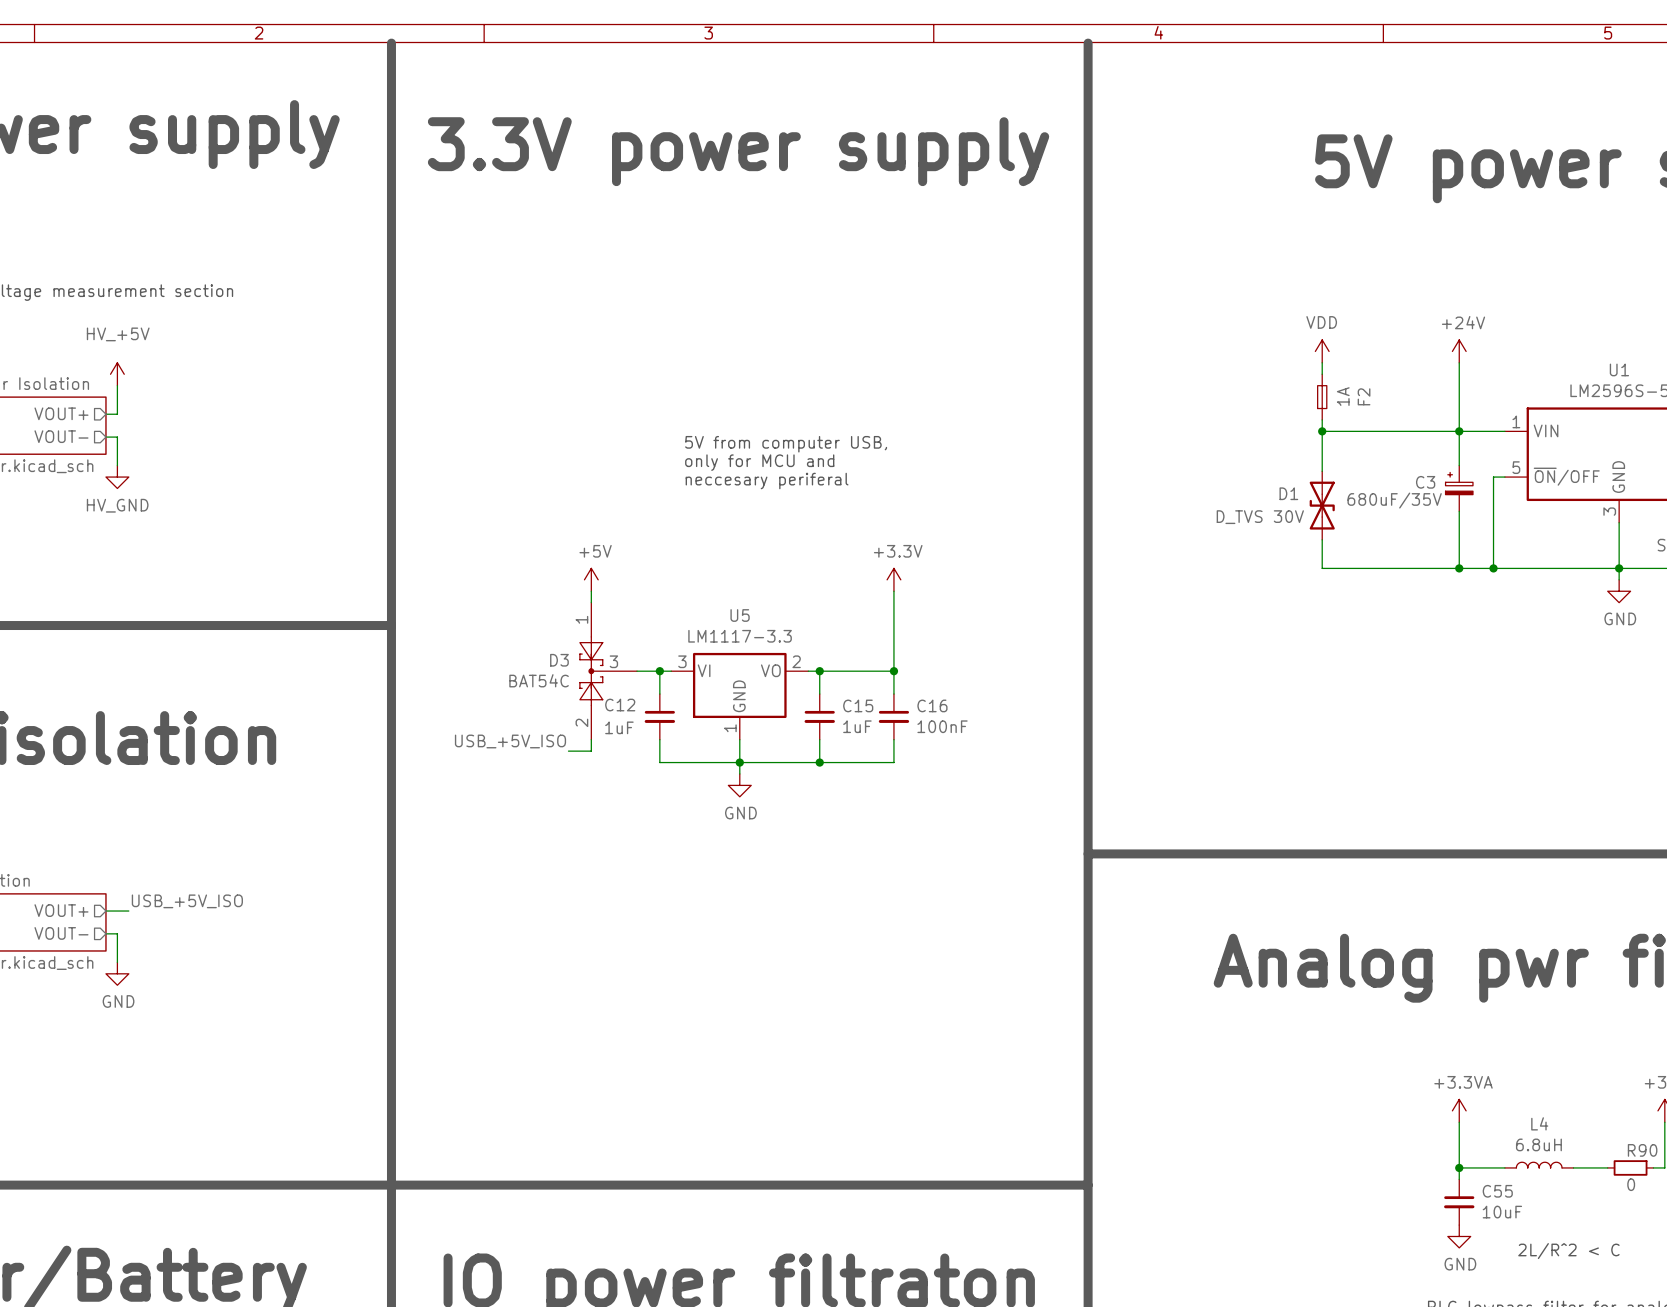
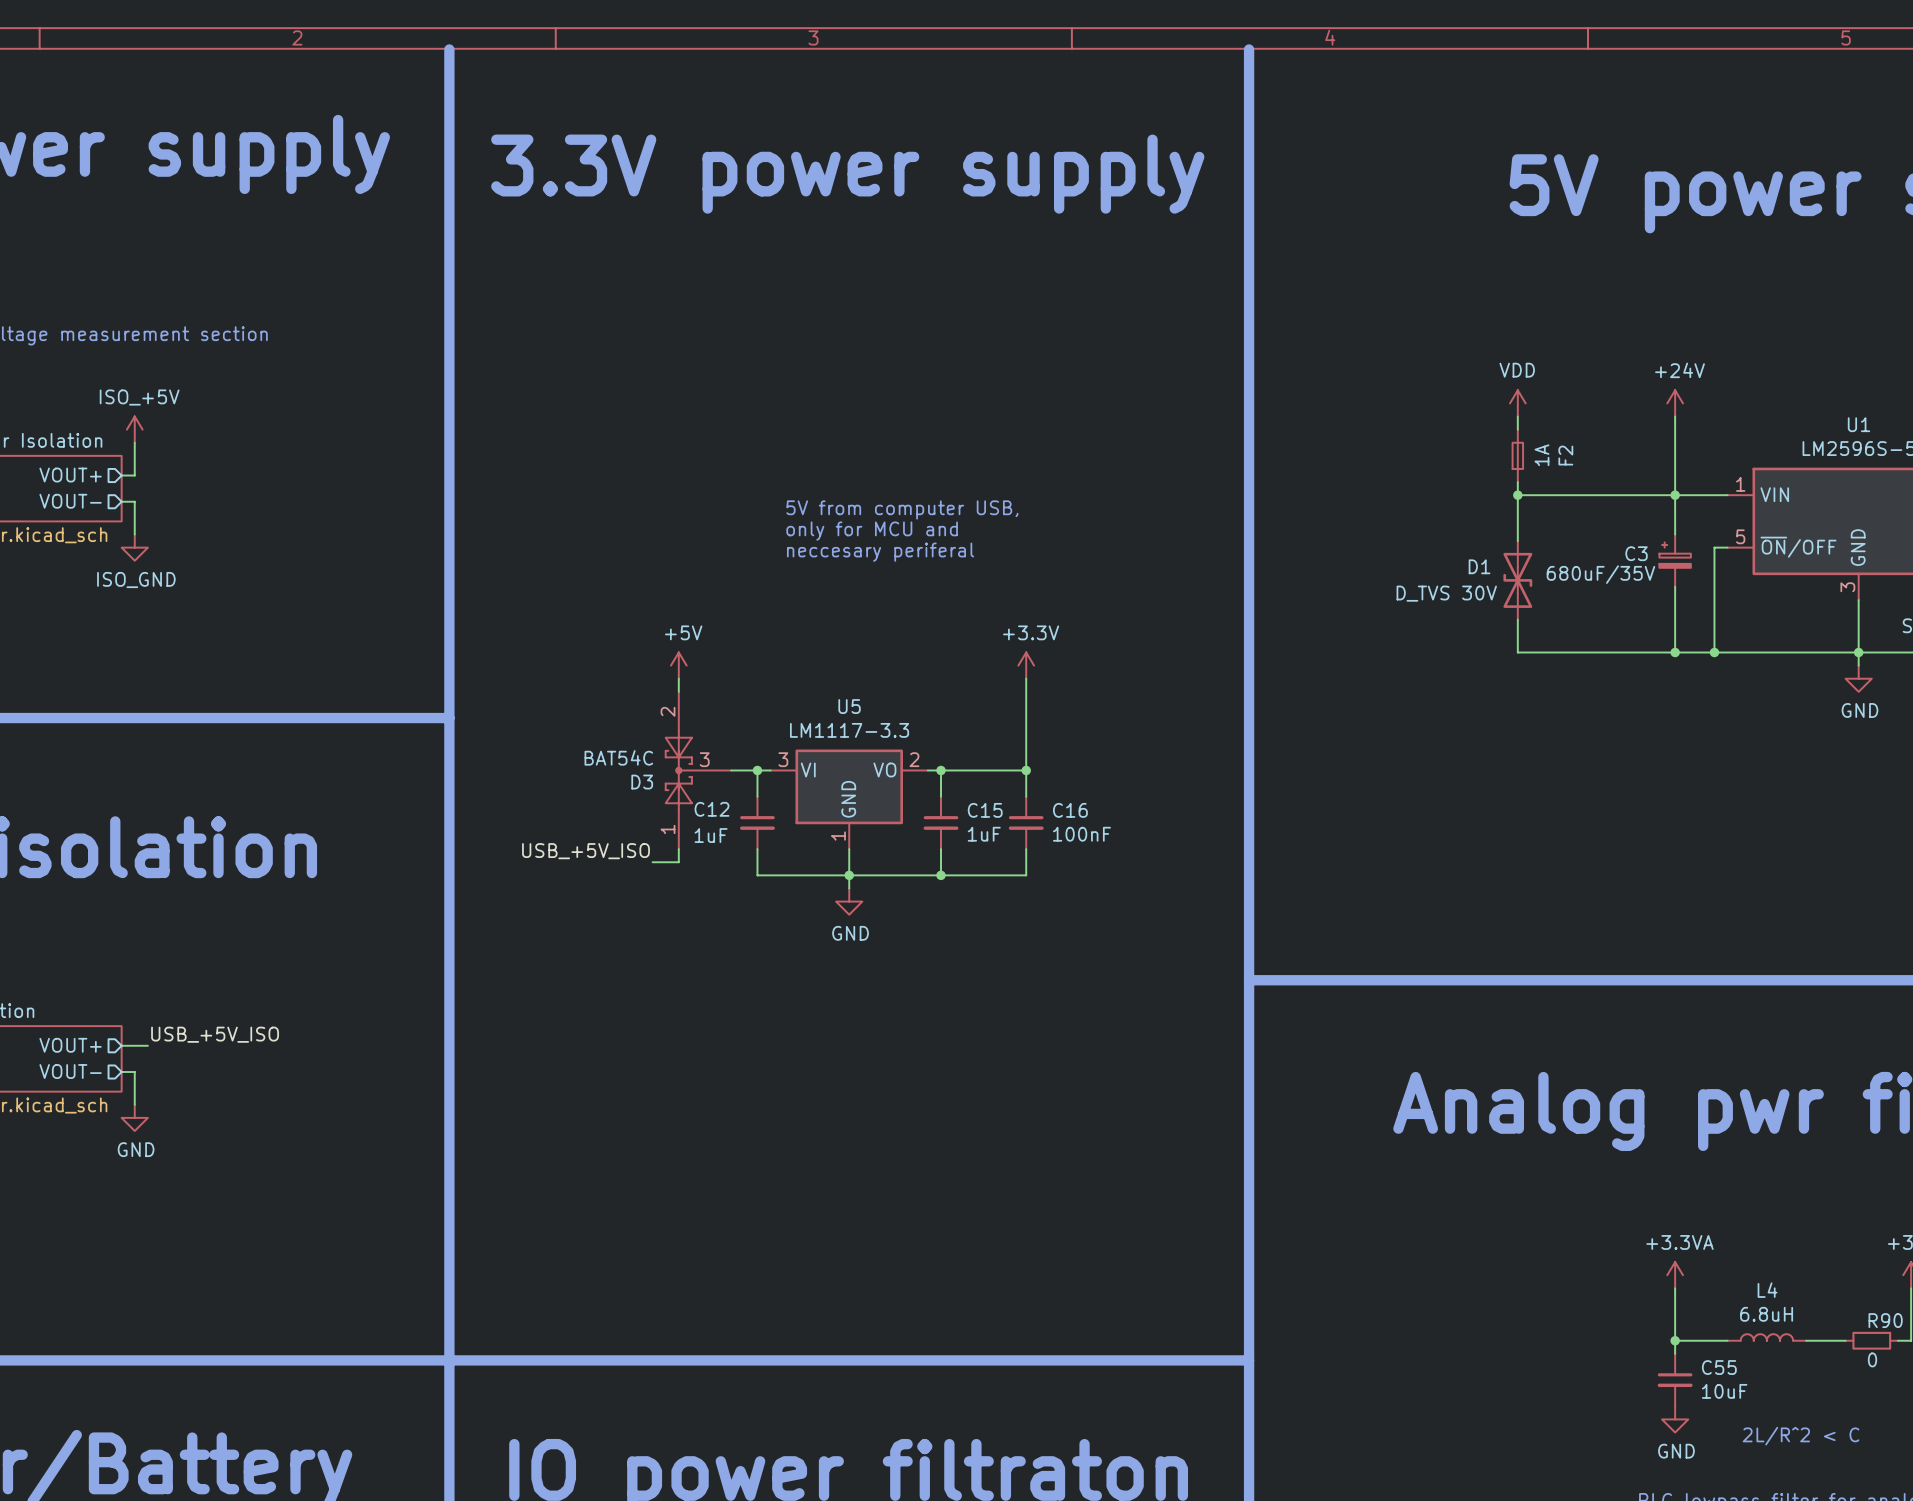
power symbol: HV_+5V (117, 374) -> ISO_+5V (134, 429)
power symbol: HV_GND (117, 477) -> ISO_GND (134, 547)
D3 flip: as is (591, 671) -> up-down (678, 770)

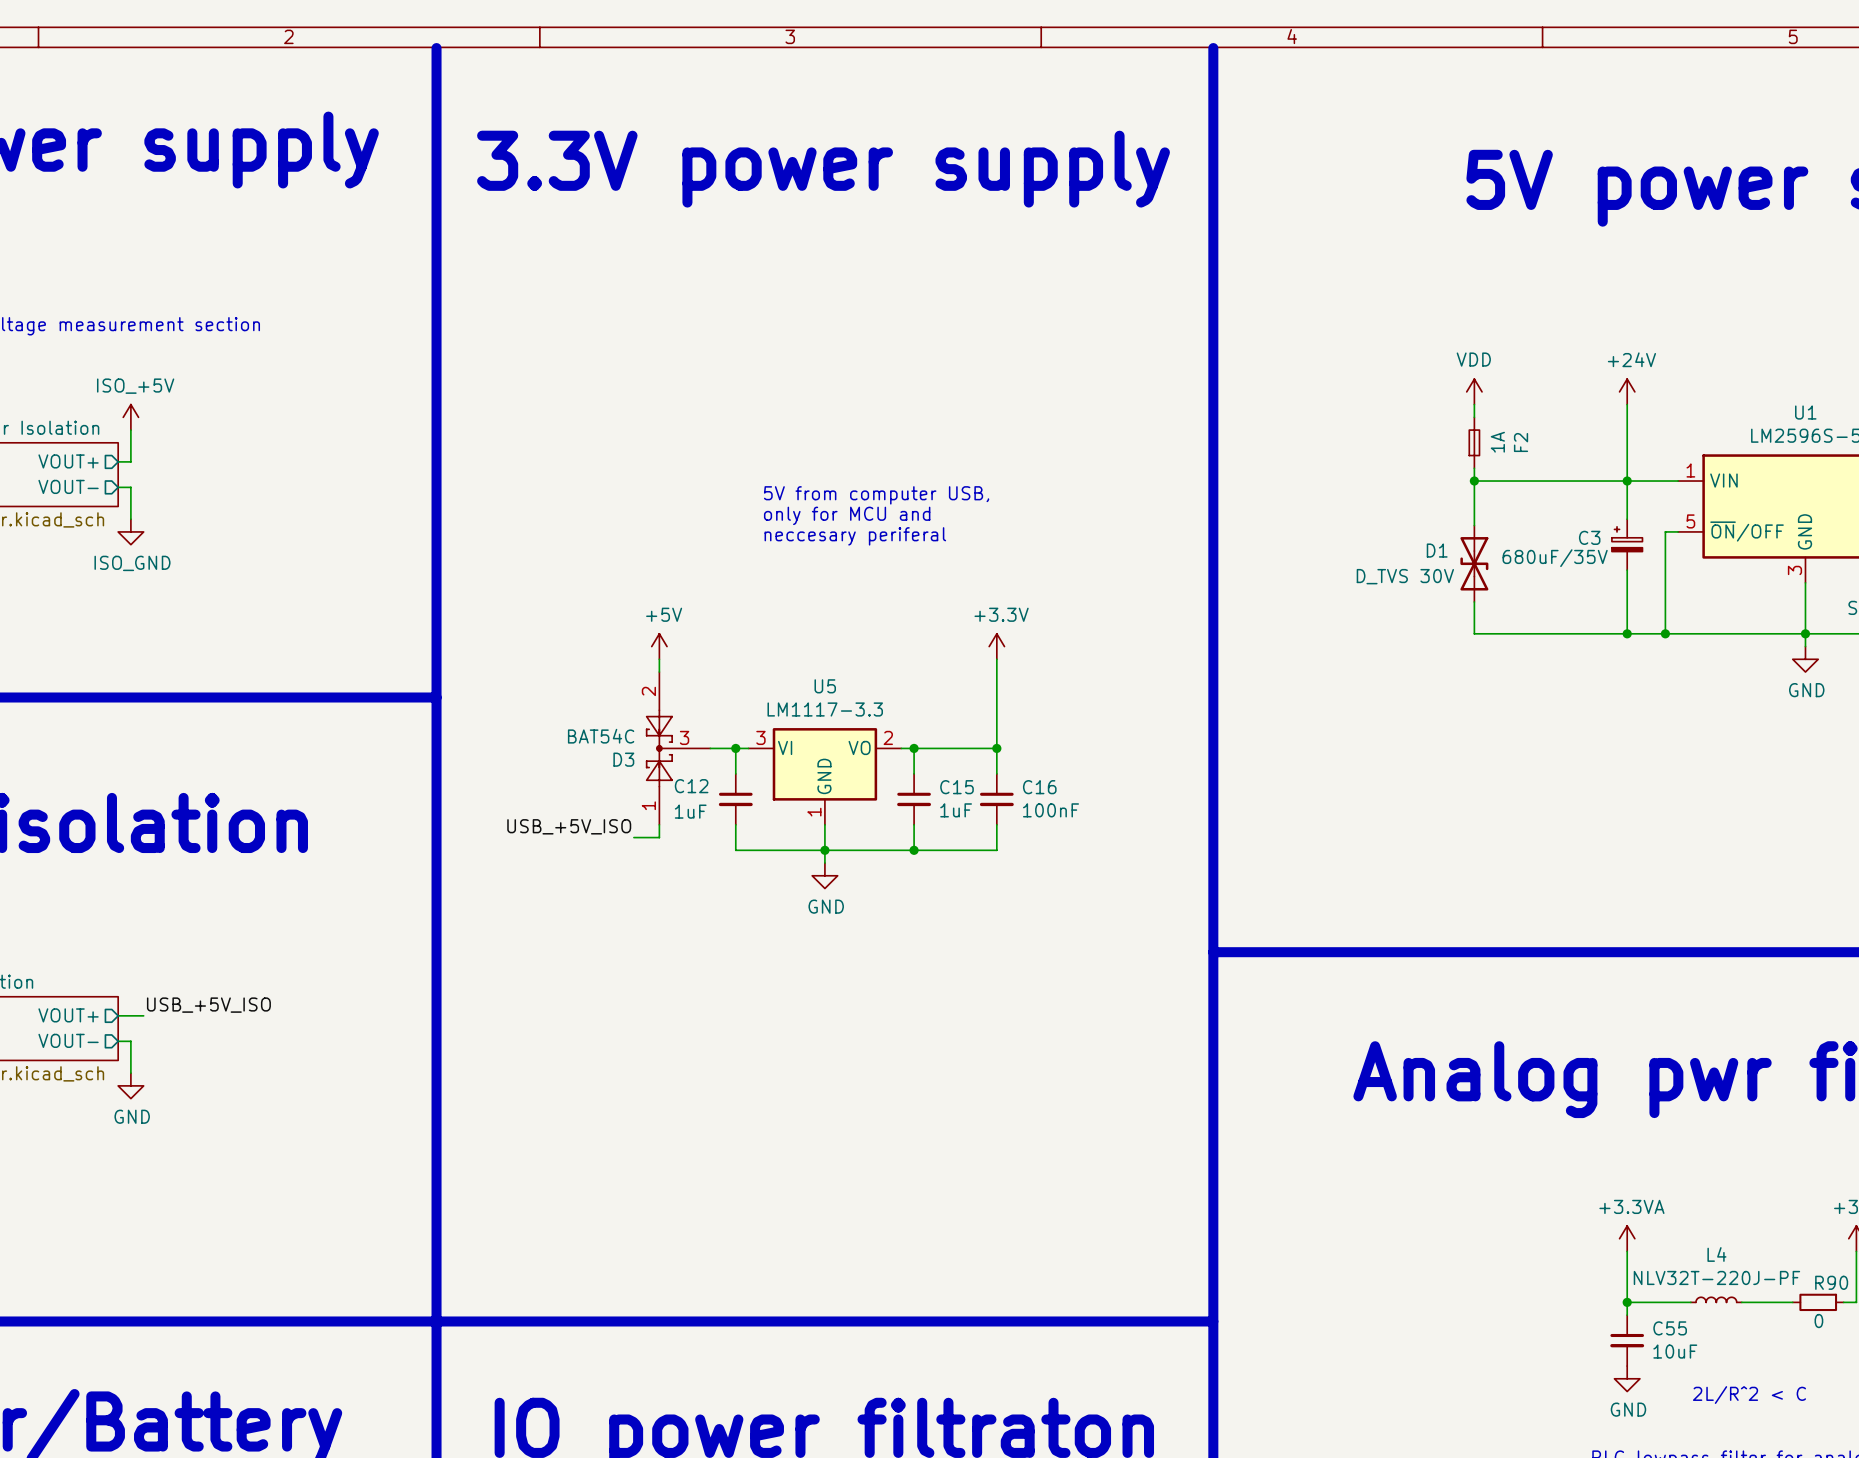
L4 value: 6.8uH (1766, 1314) -> NLV32T-220J-PF (1716, 1277)
L4 symbol: [1727, 1334, 1807, 1341] -> [1690, 1297, 1742, 1303]

